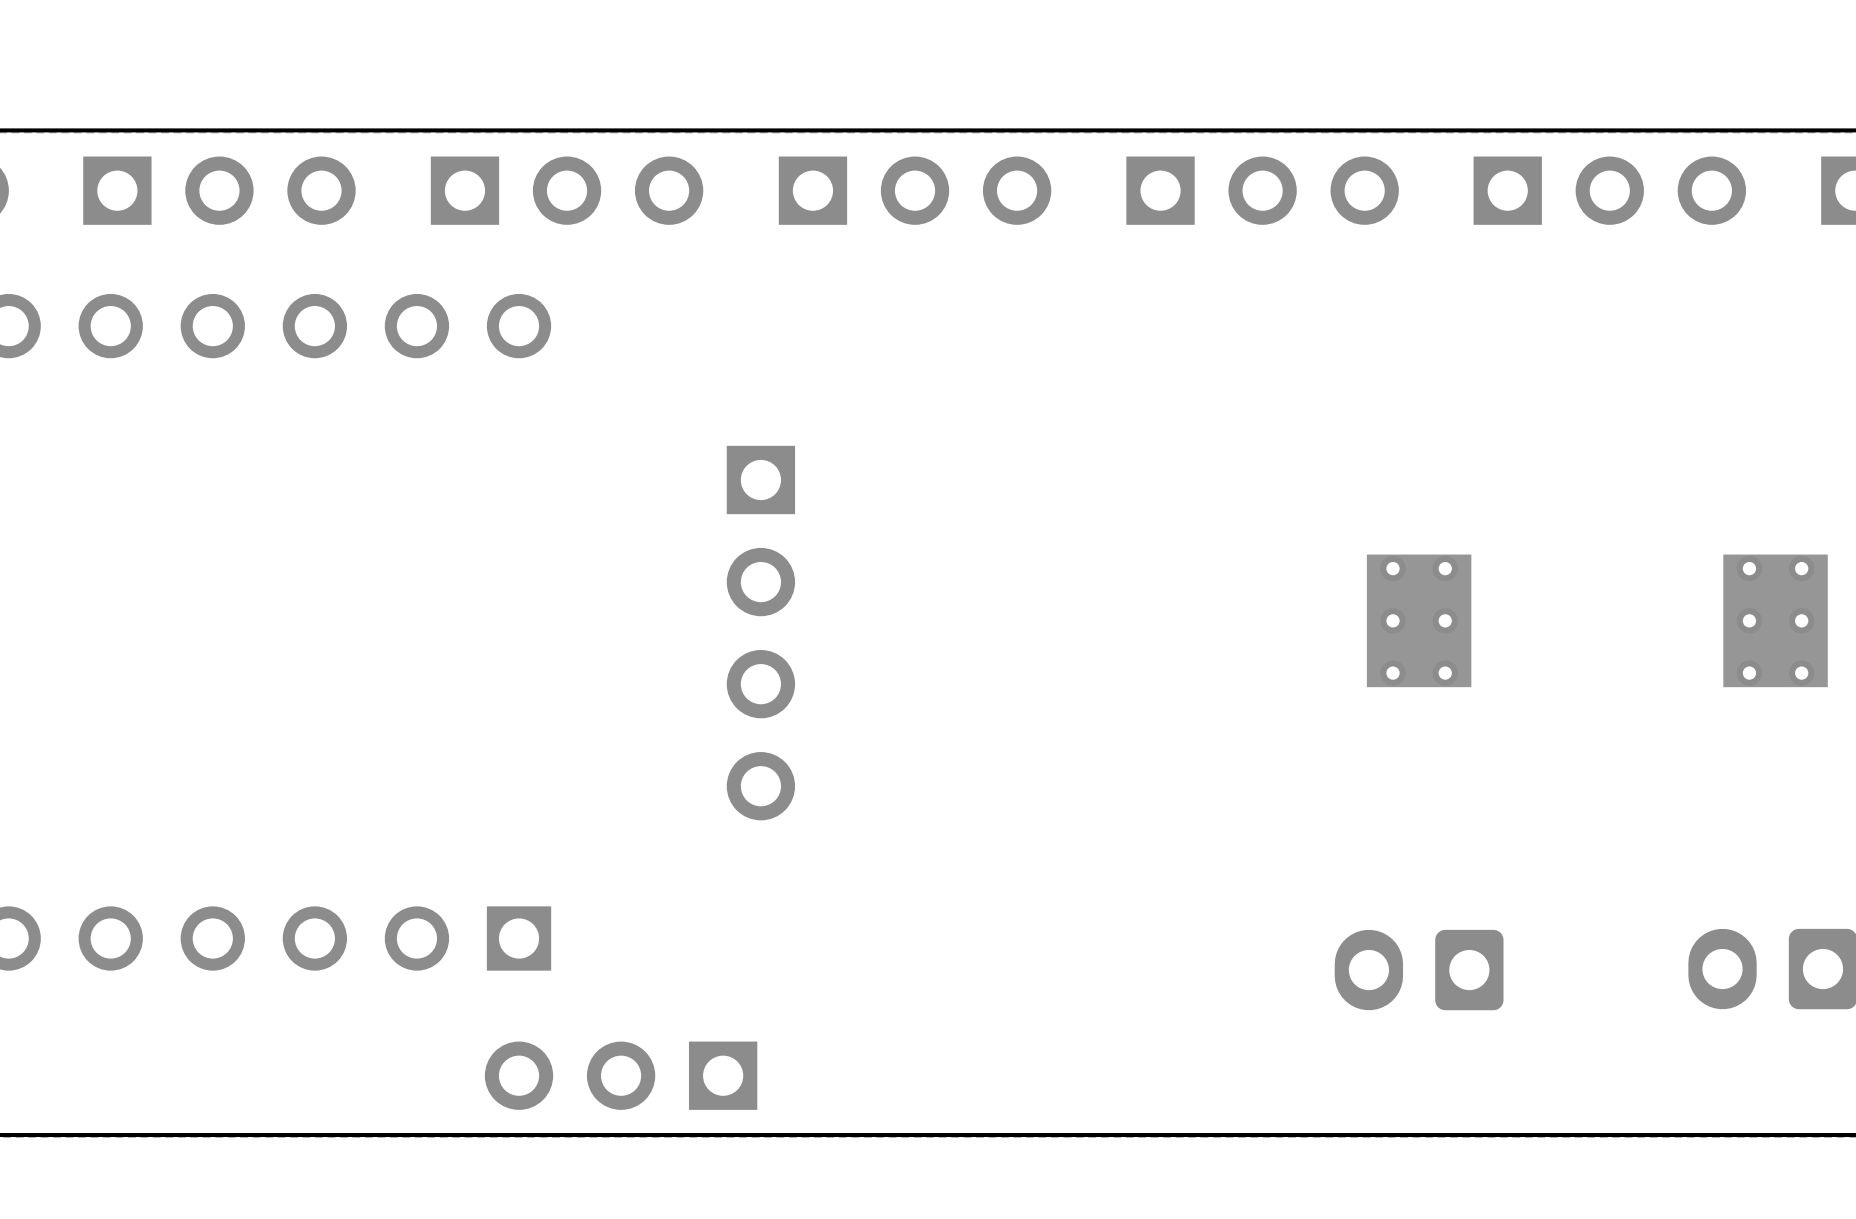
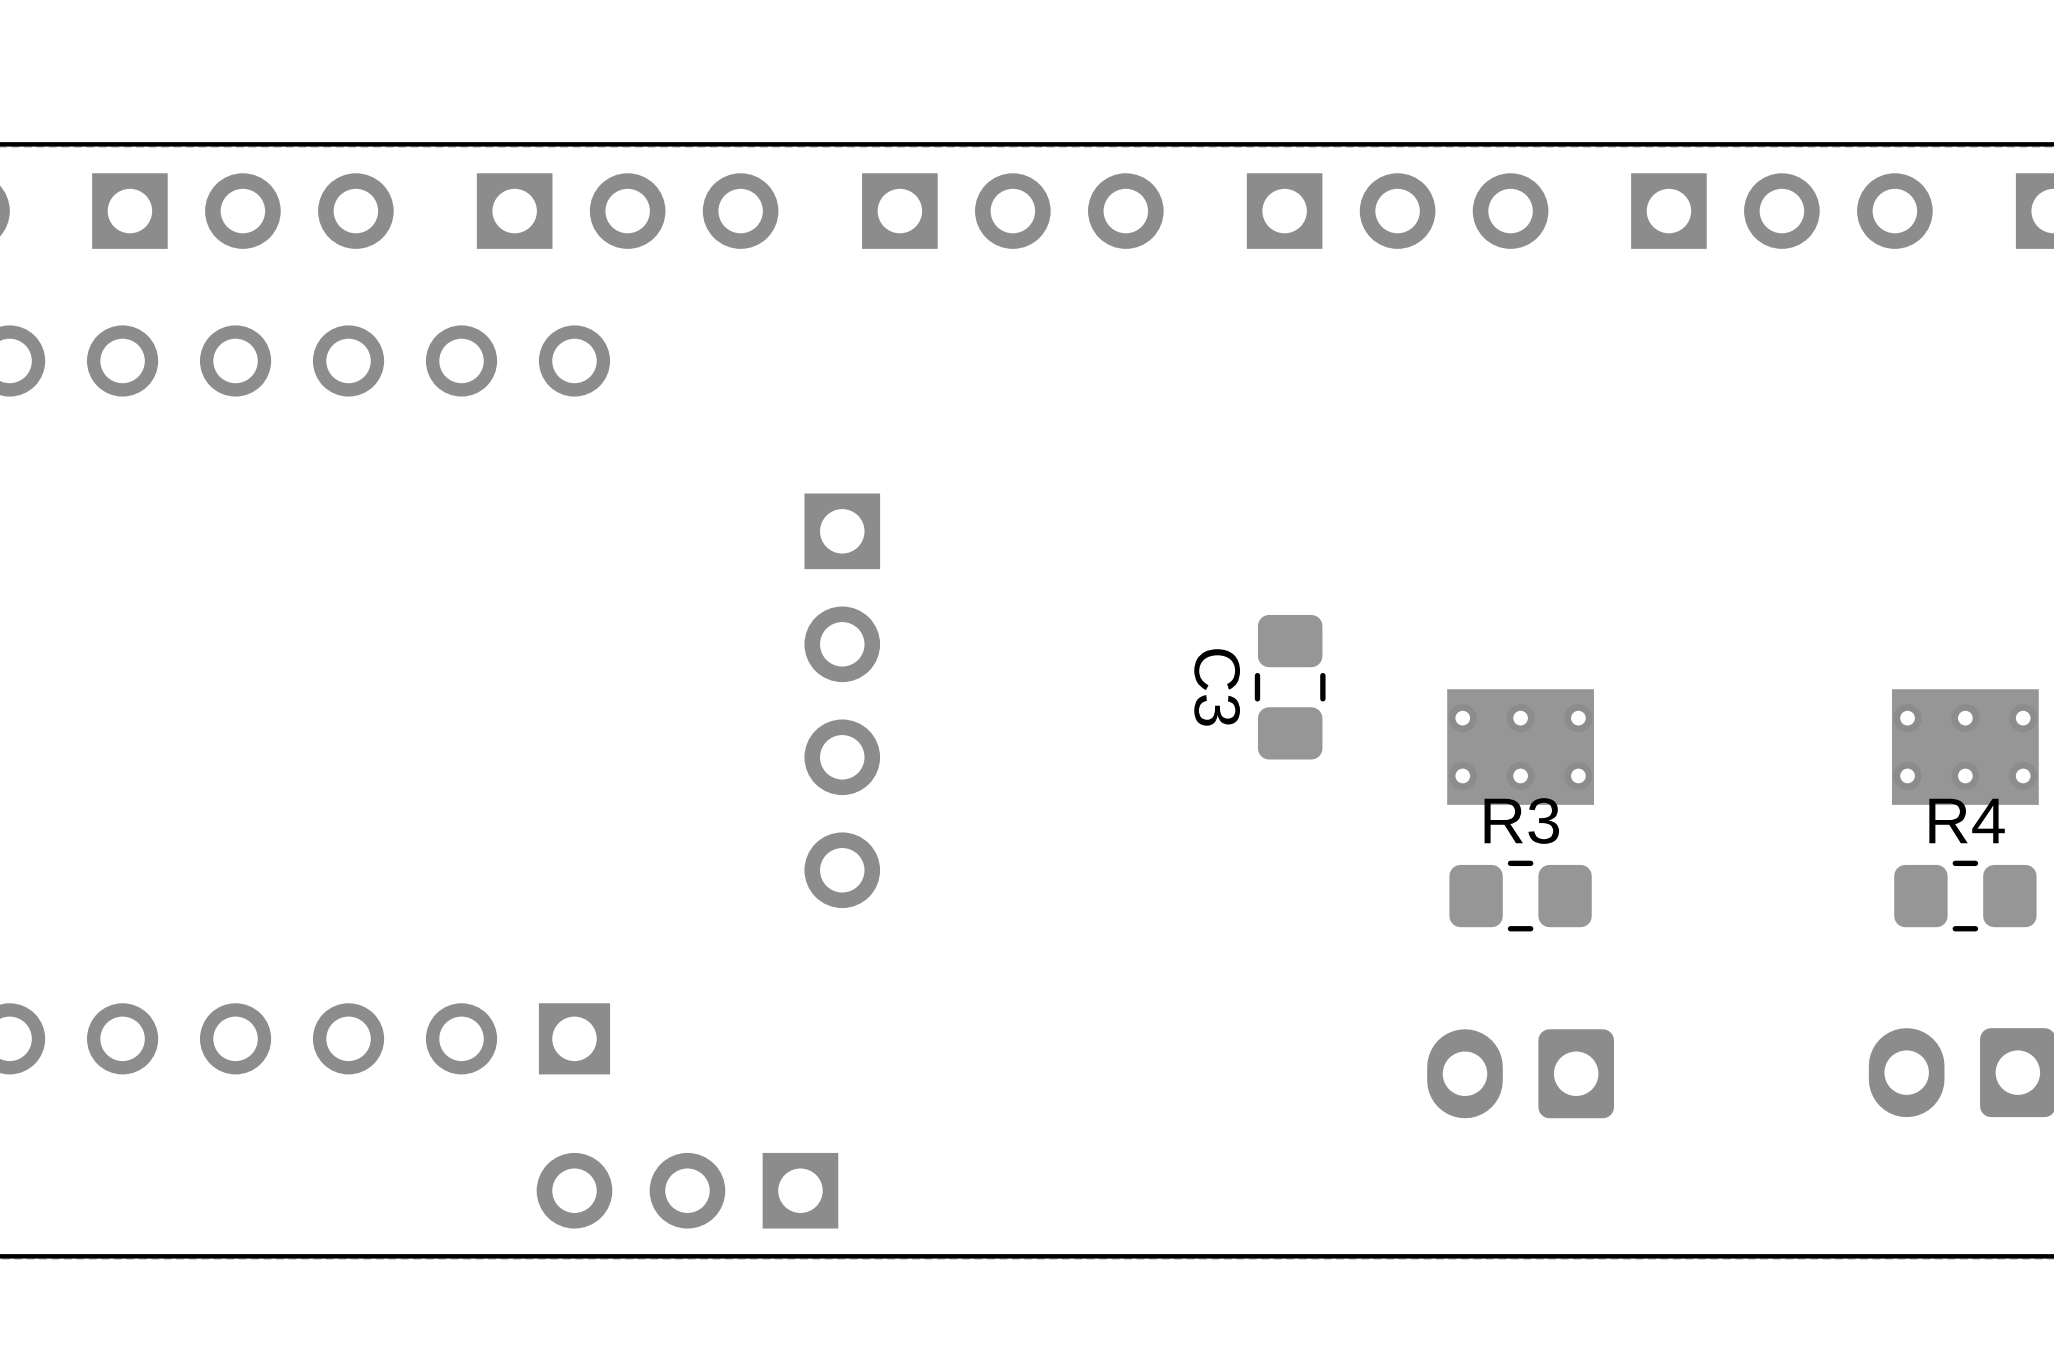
C3: none -> (1290, 687)
part rotation: 0° (1419, 620) -> 90° clockwise (1520, 747)
part rotation: 0° (1775, 620) -> 90° clockwise (1965, 747)
R3: none -> (1520, 896)
R4: none -> (1965, 896)
part position: (1419, 970) -> (1520, 1073)

